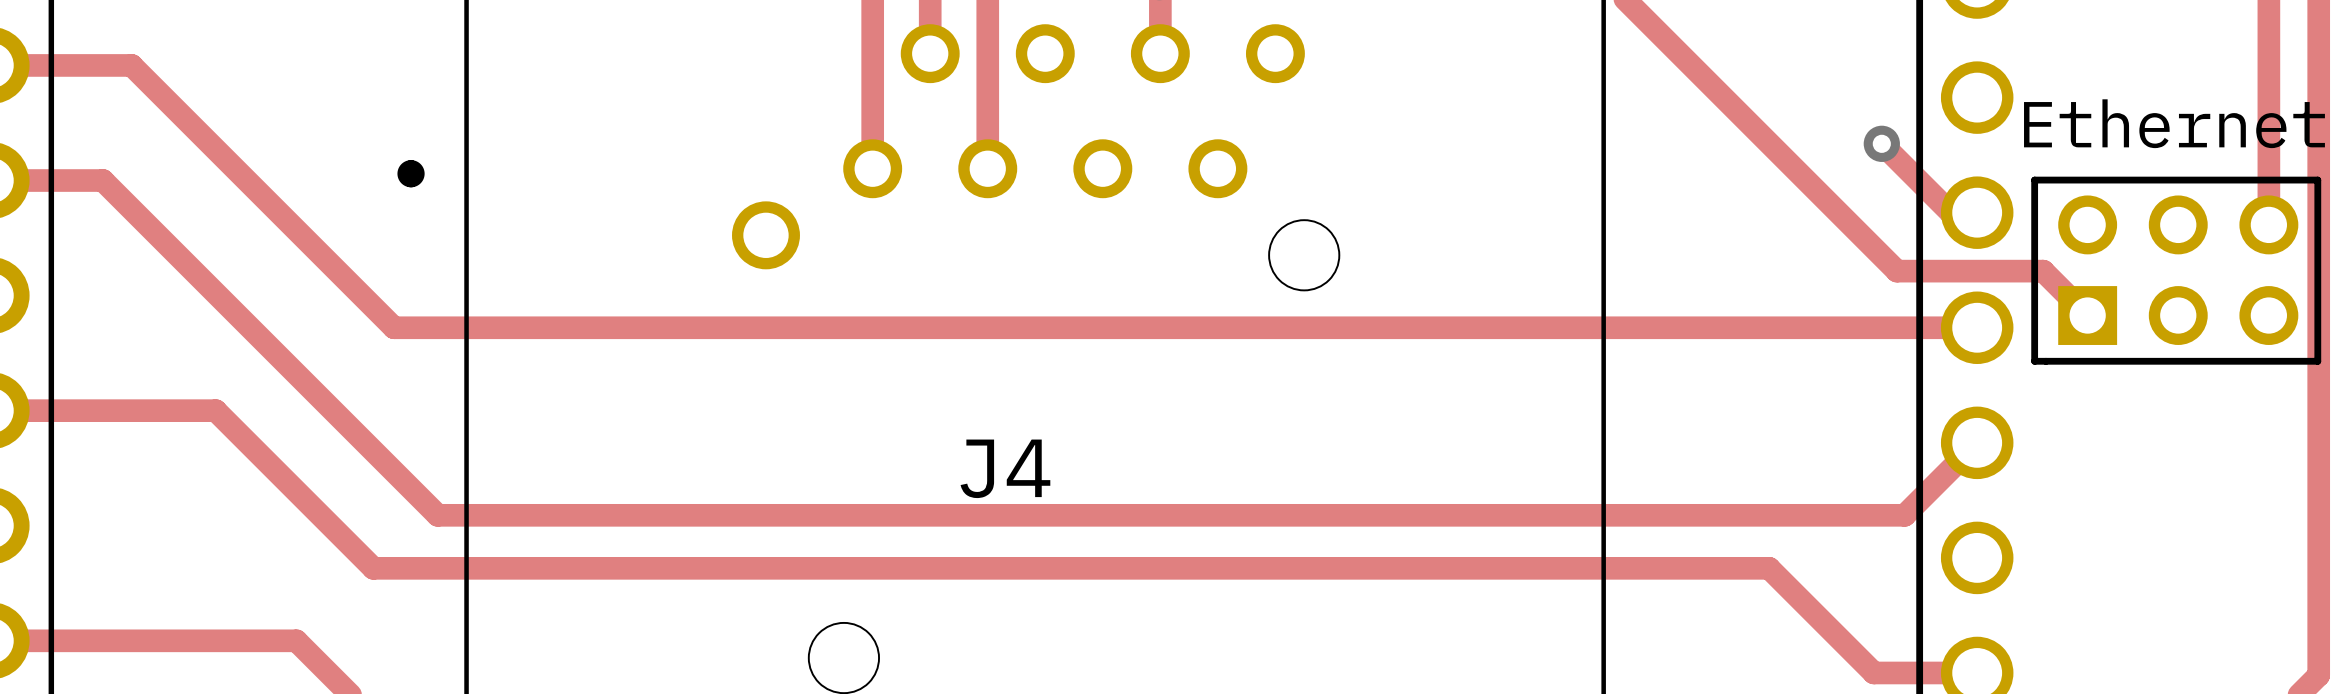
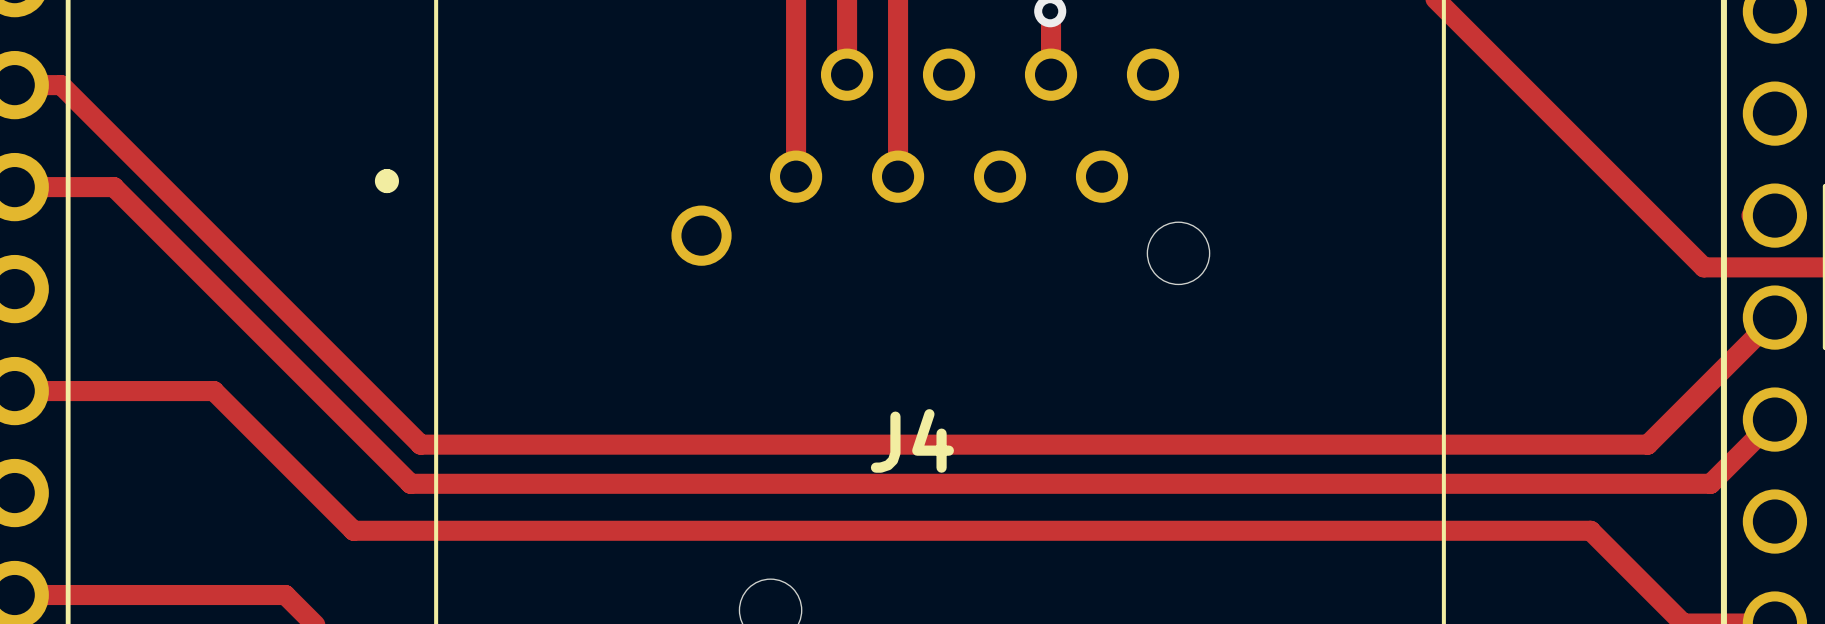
track: (43, 65) (131, 65) (394, 327) (1977, 327) -> (61, 85) (420, 444) (1647, 444) (1774, 317)
track: (1881, 143) (1950, 212) -> none
via: (1881, 143) -> none

